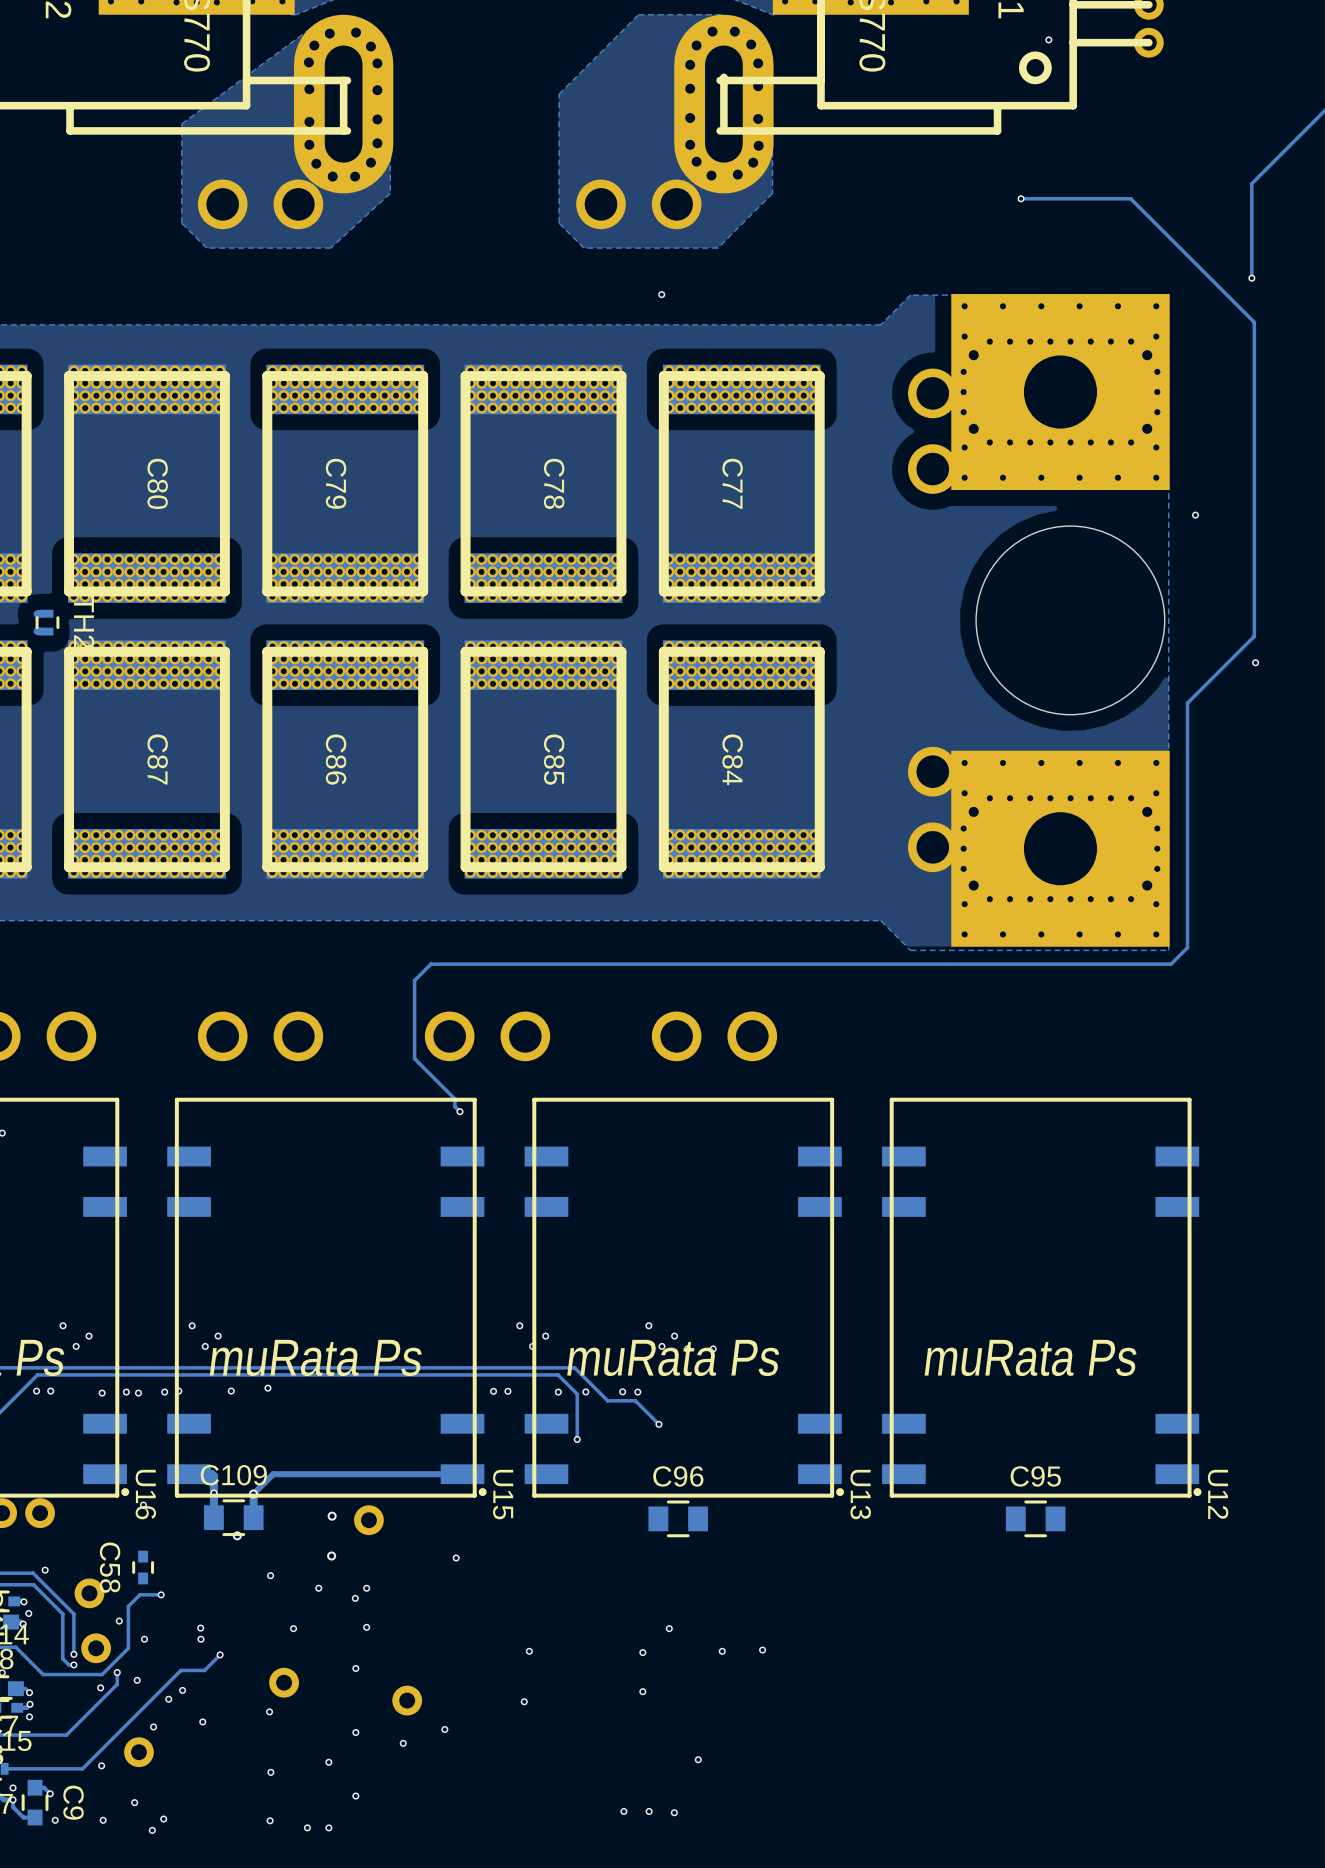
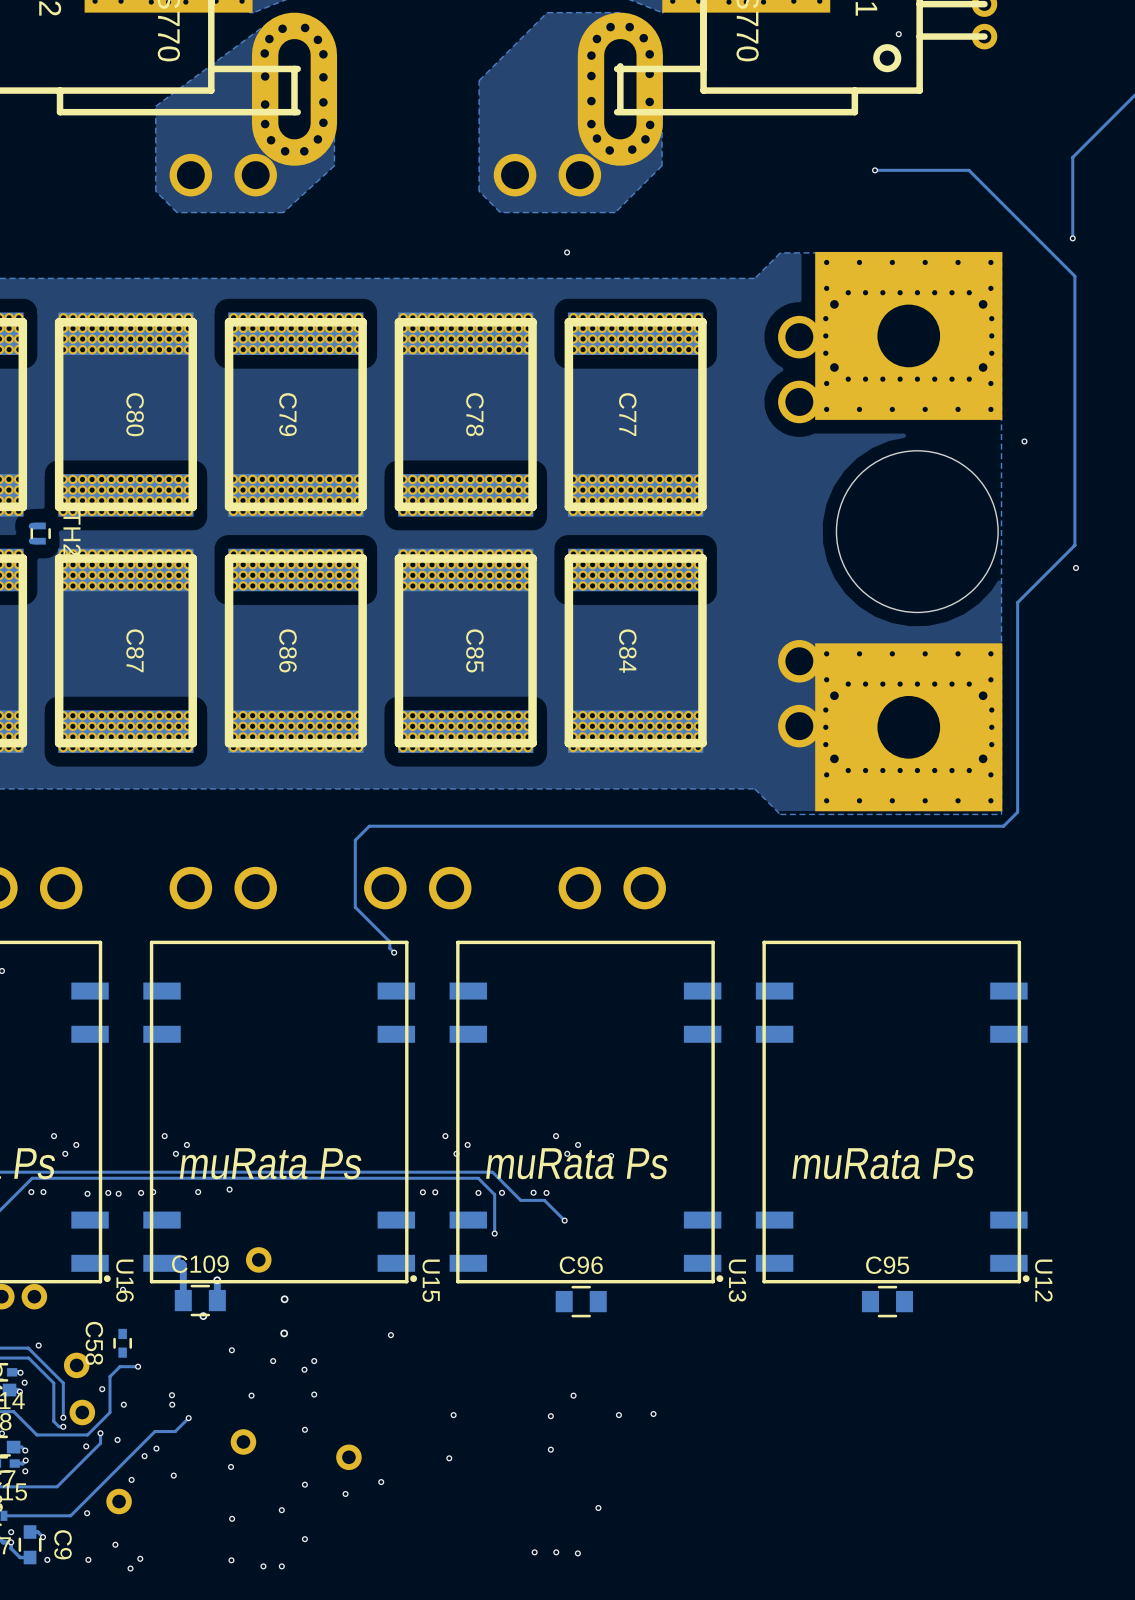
track: (462, 1474) (273, 1474) (253, 1493) -> none
via: (213, 1492) -> none
part position: (368, 1520) -> (258, 1259)

